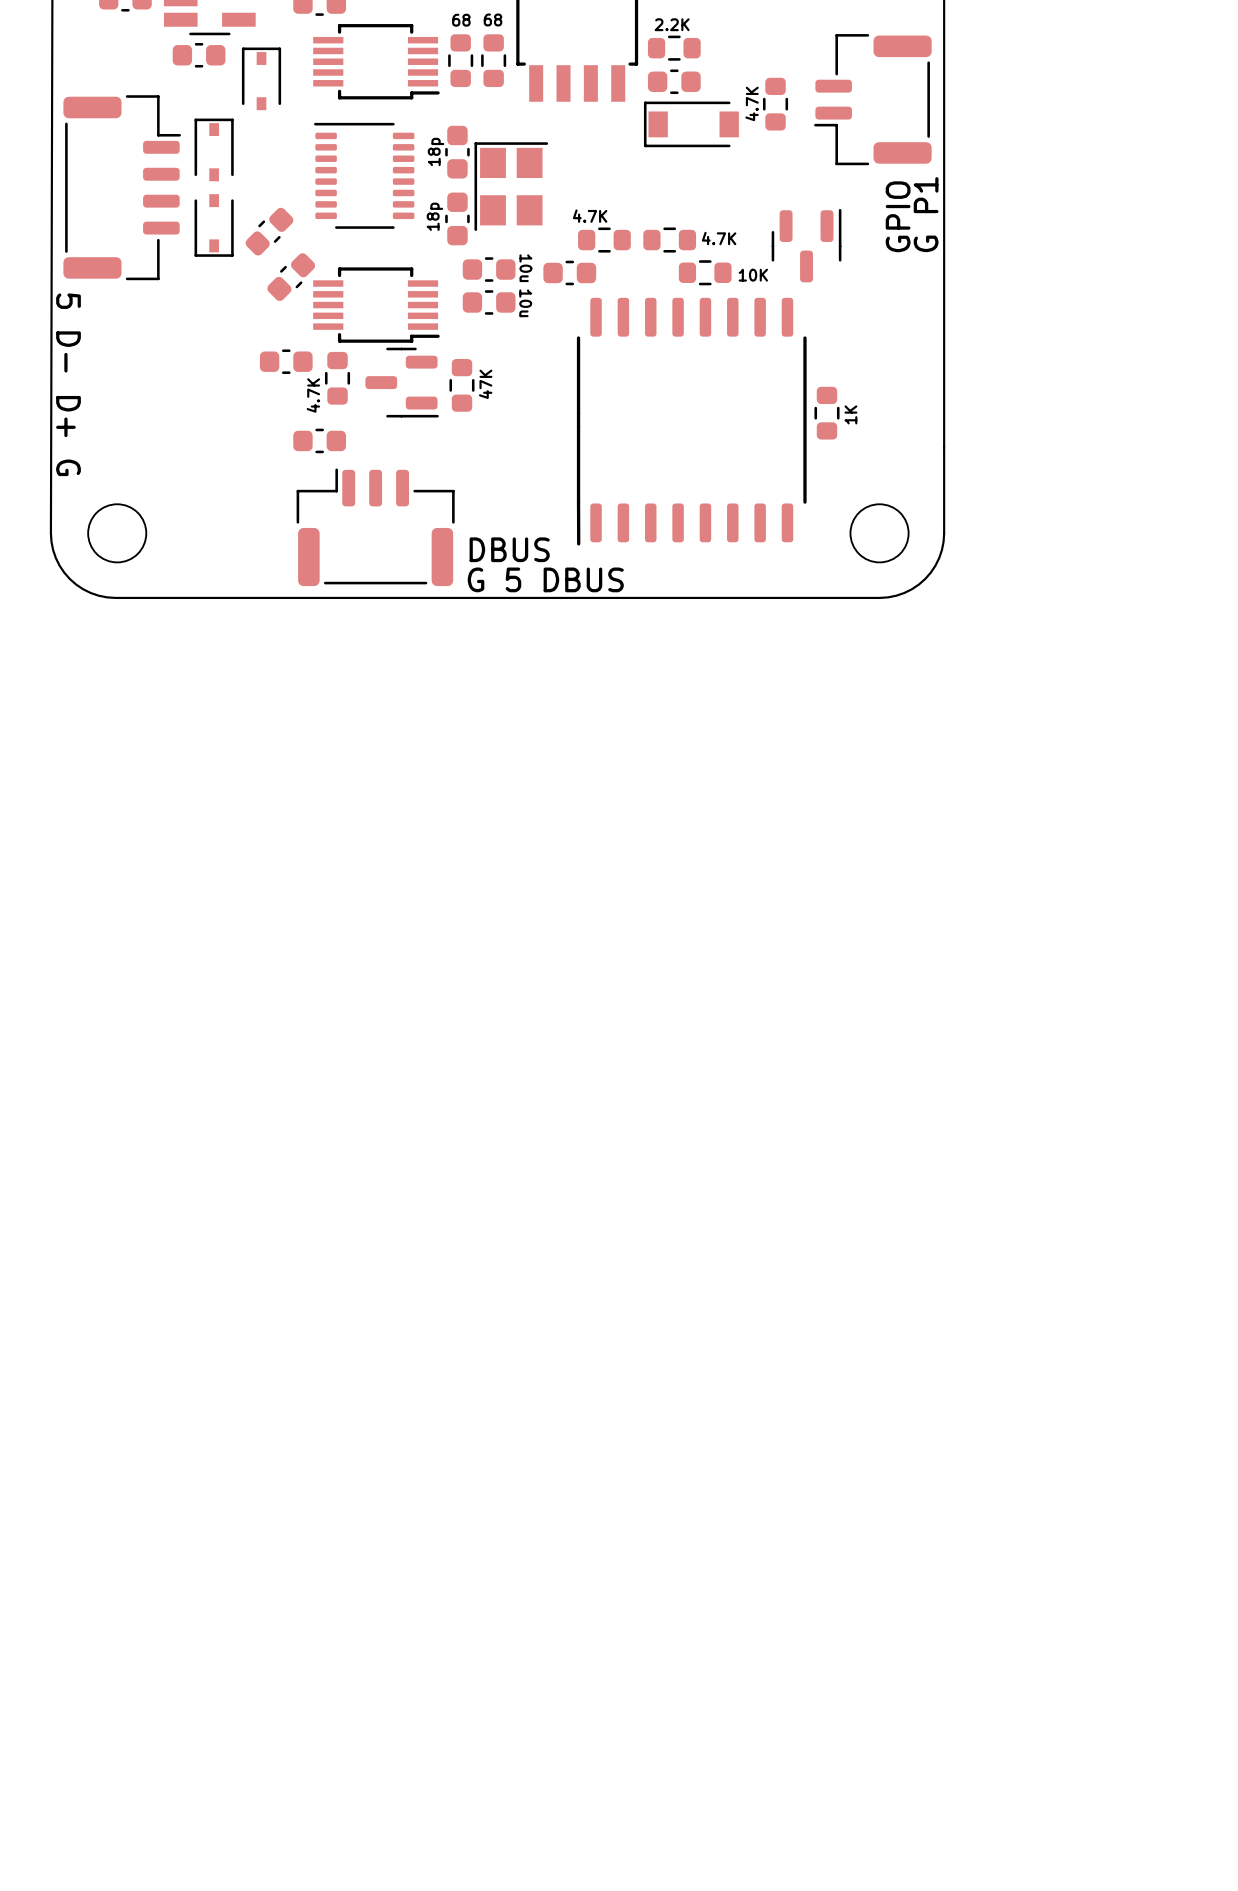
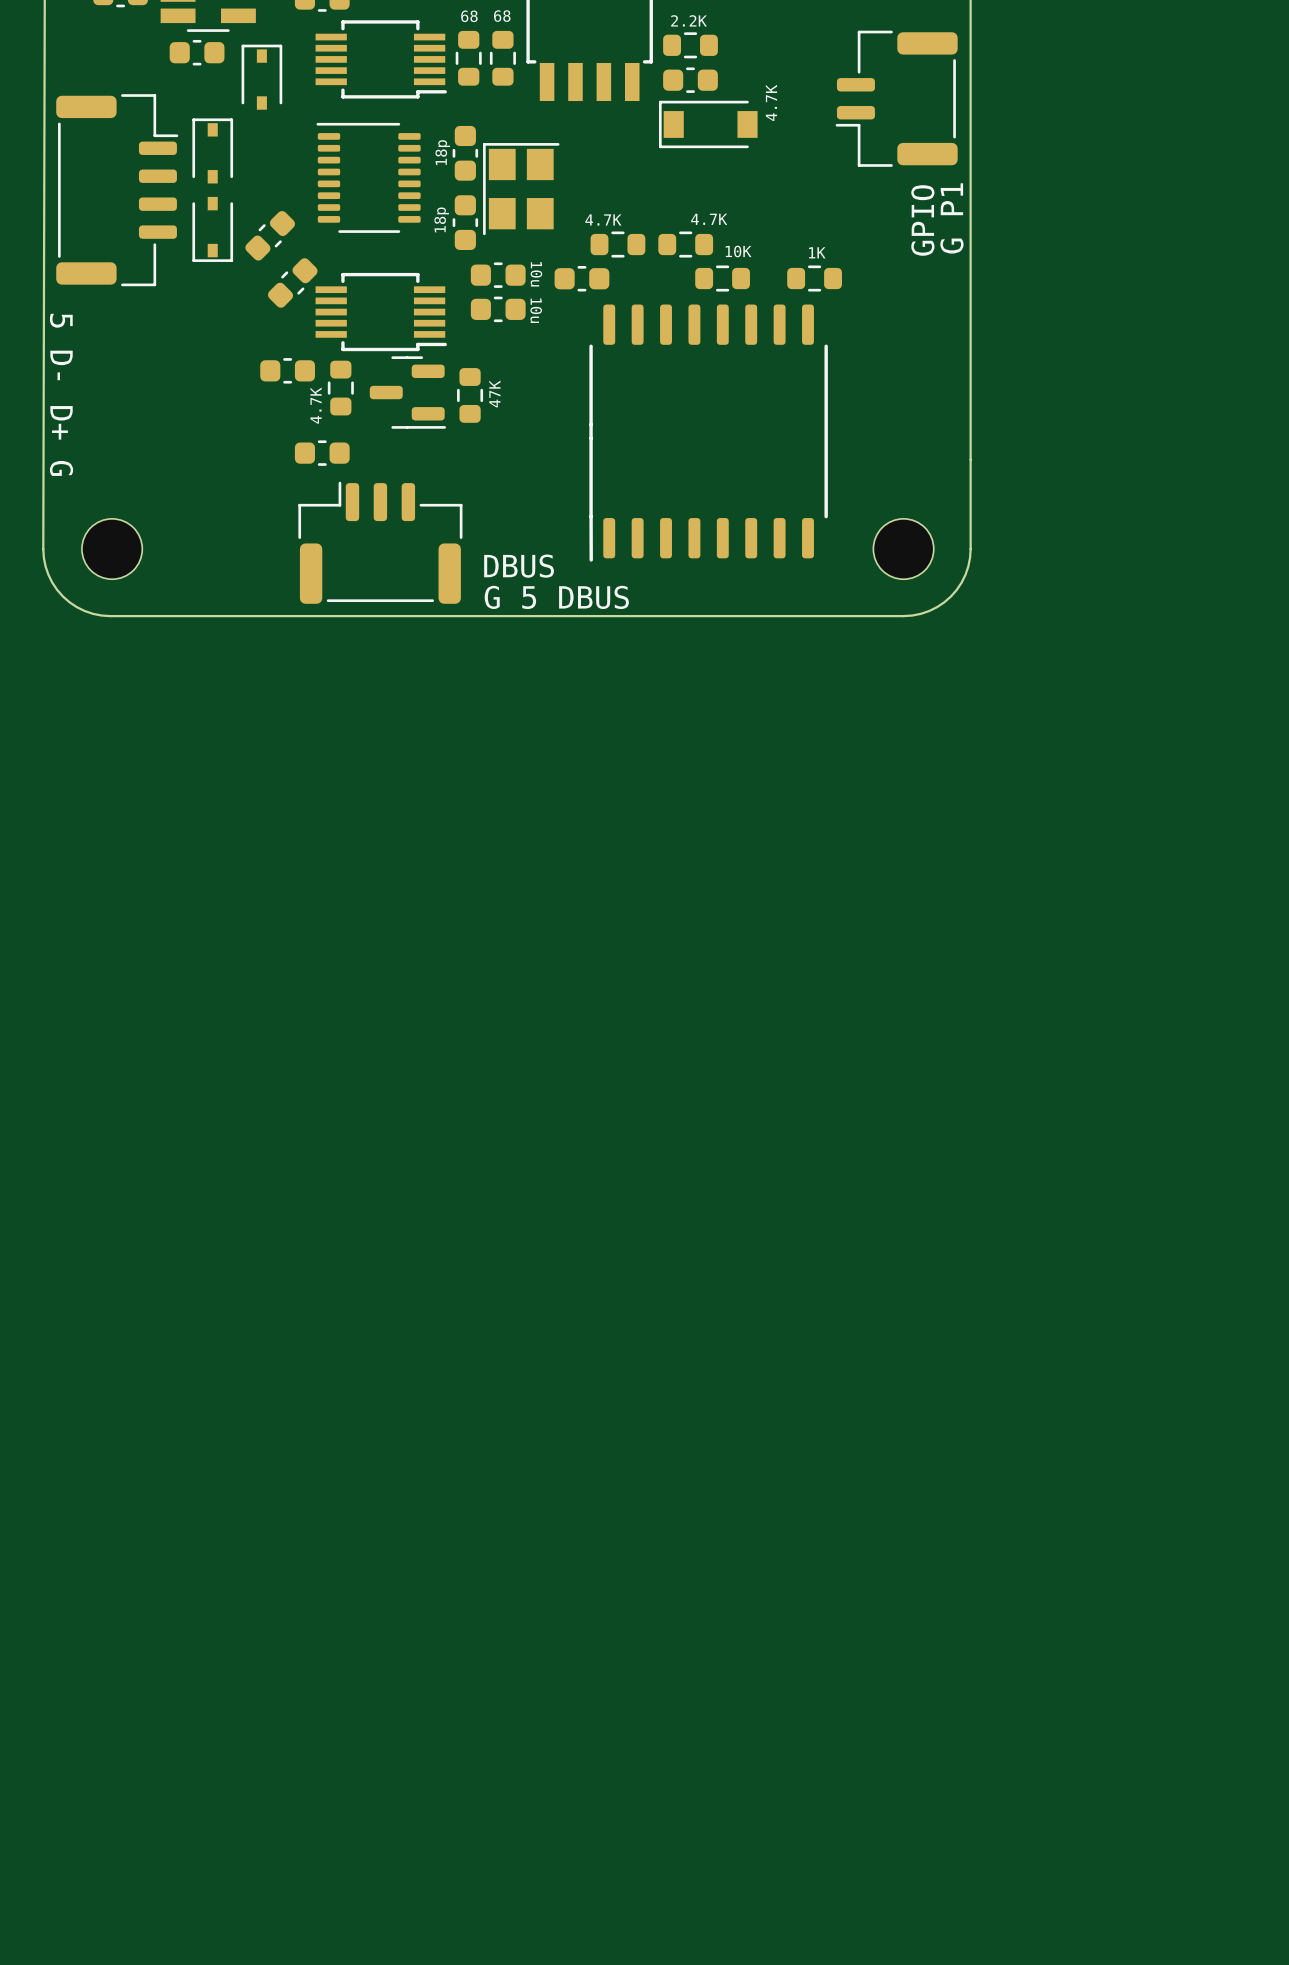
part: (775, 104) -> none
text: none -> 4.7K (709, 219)
text: 4.7K (719, 238) -> 10K (738, 251)
part: (806, 245) -> none
part: none -> (814, 278)
text: 10K (753, 275) -> none
part: (826, 413) -> none
text rotation: 0° (850, 414) -> 90° clockwise (817, 252)
text position: 1K (850, 414) -> 1K (817, 252)

